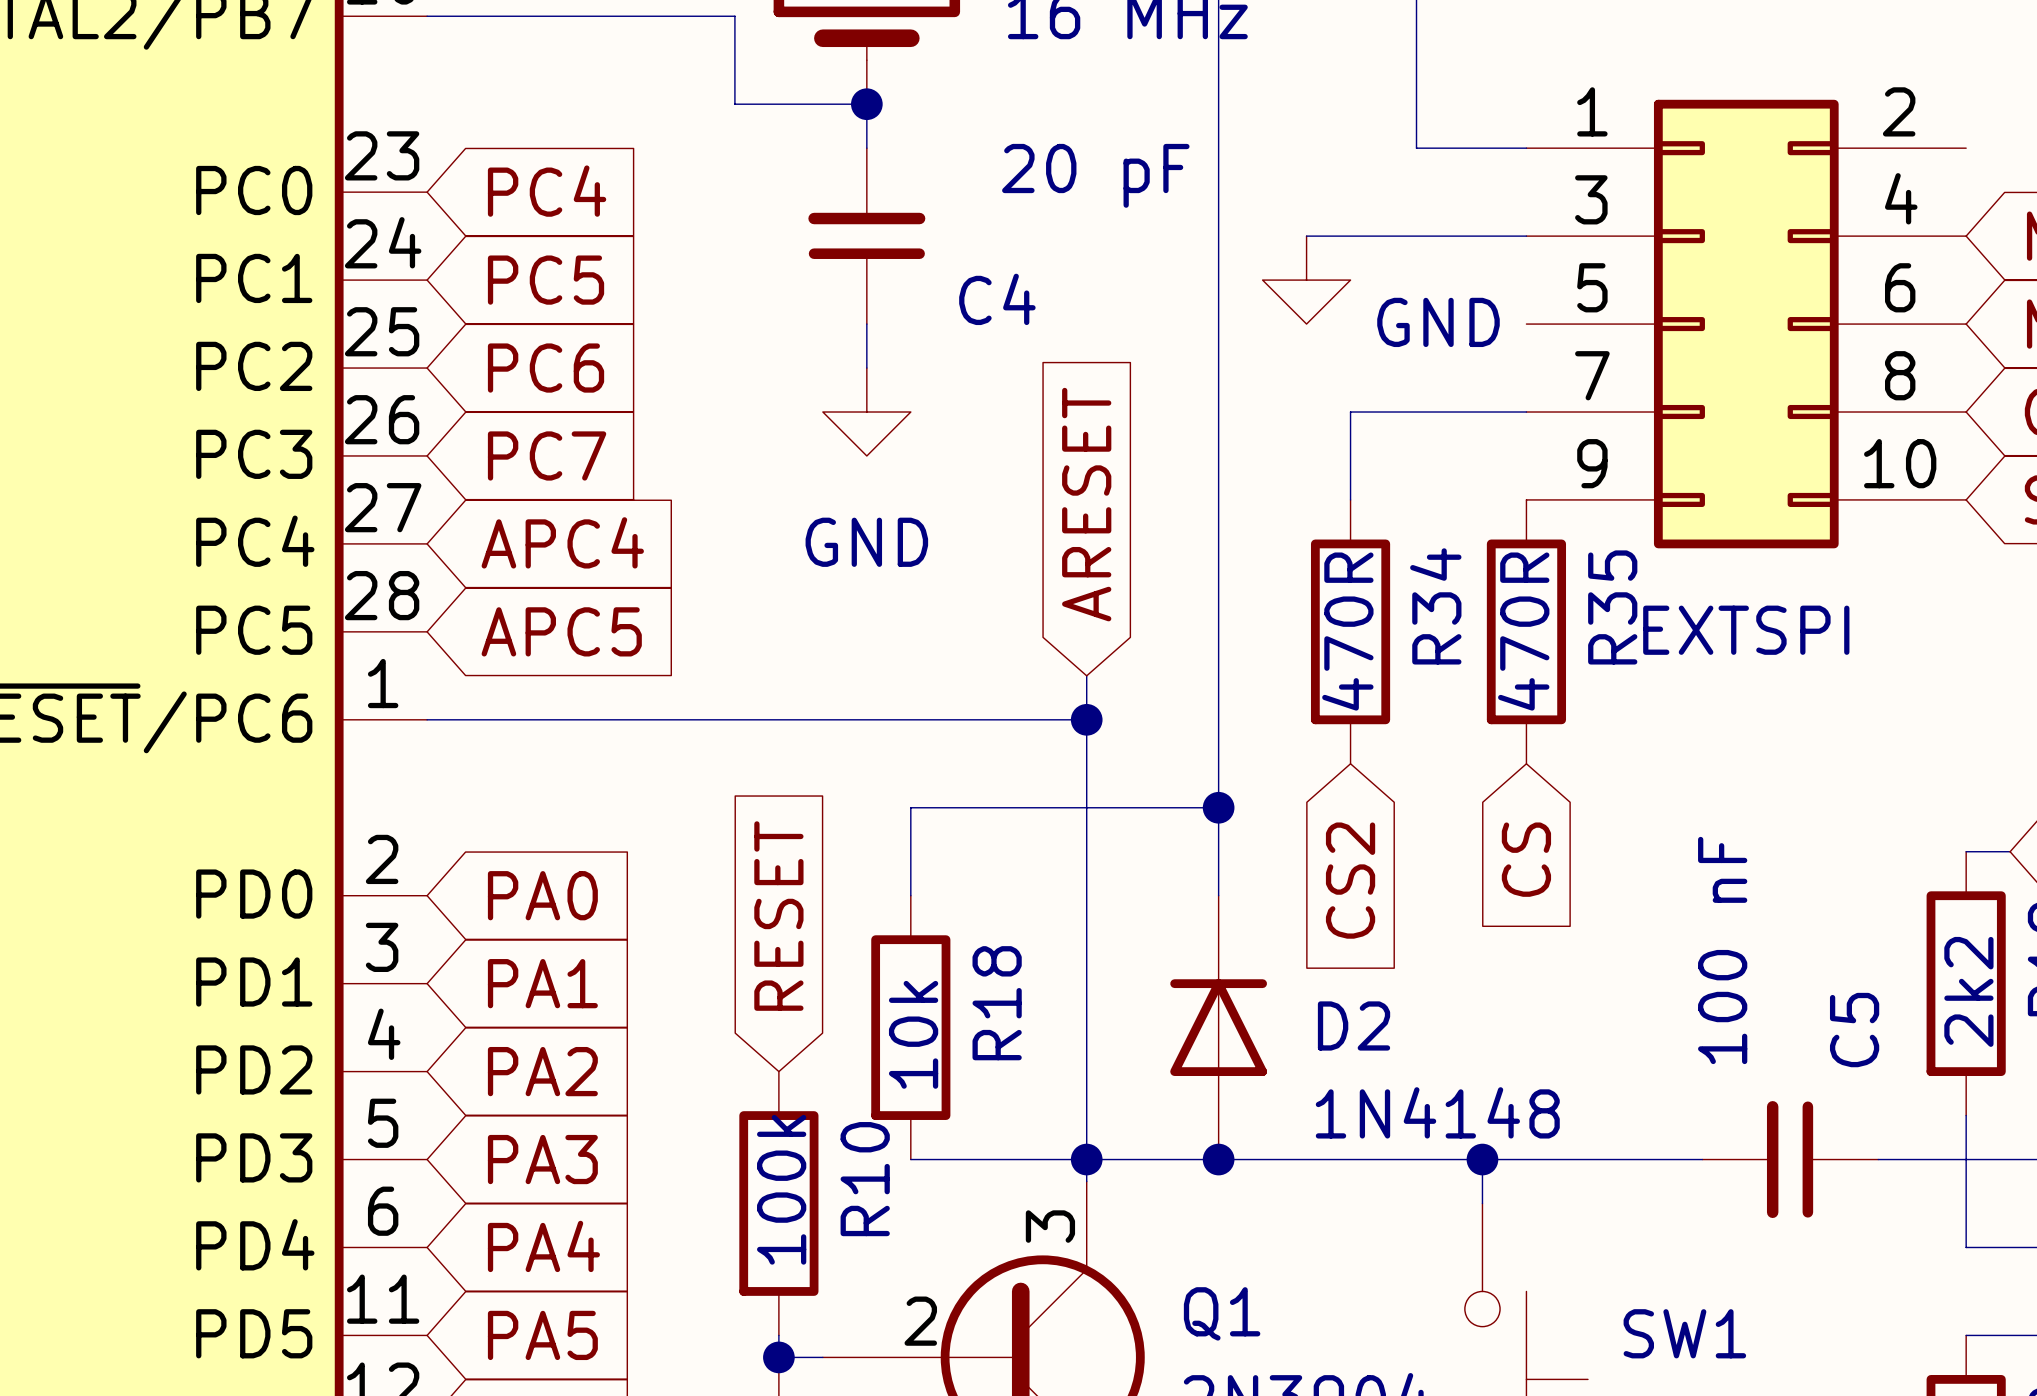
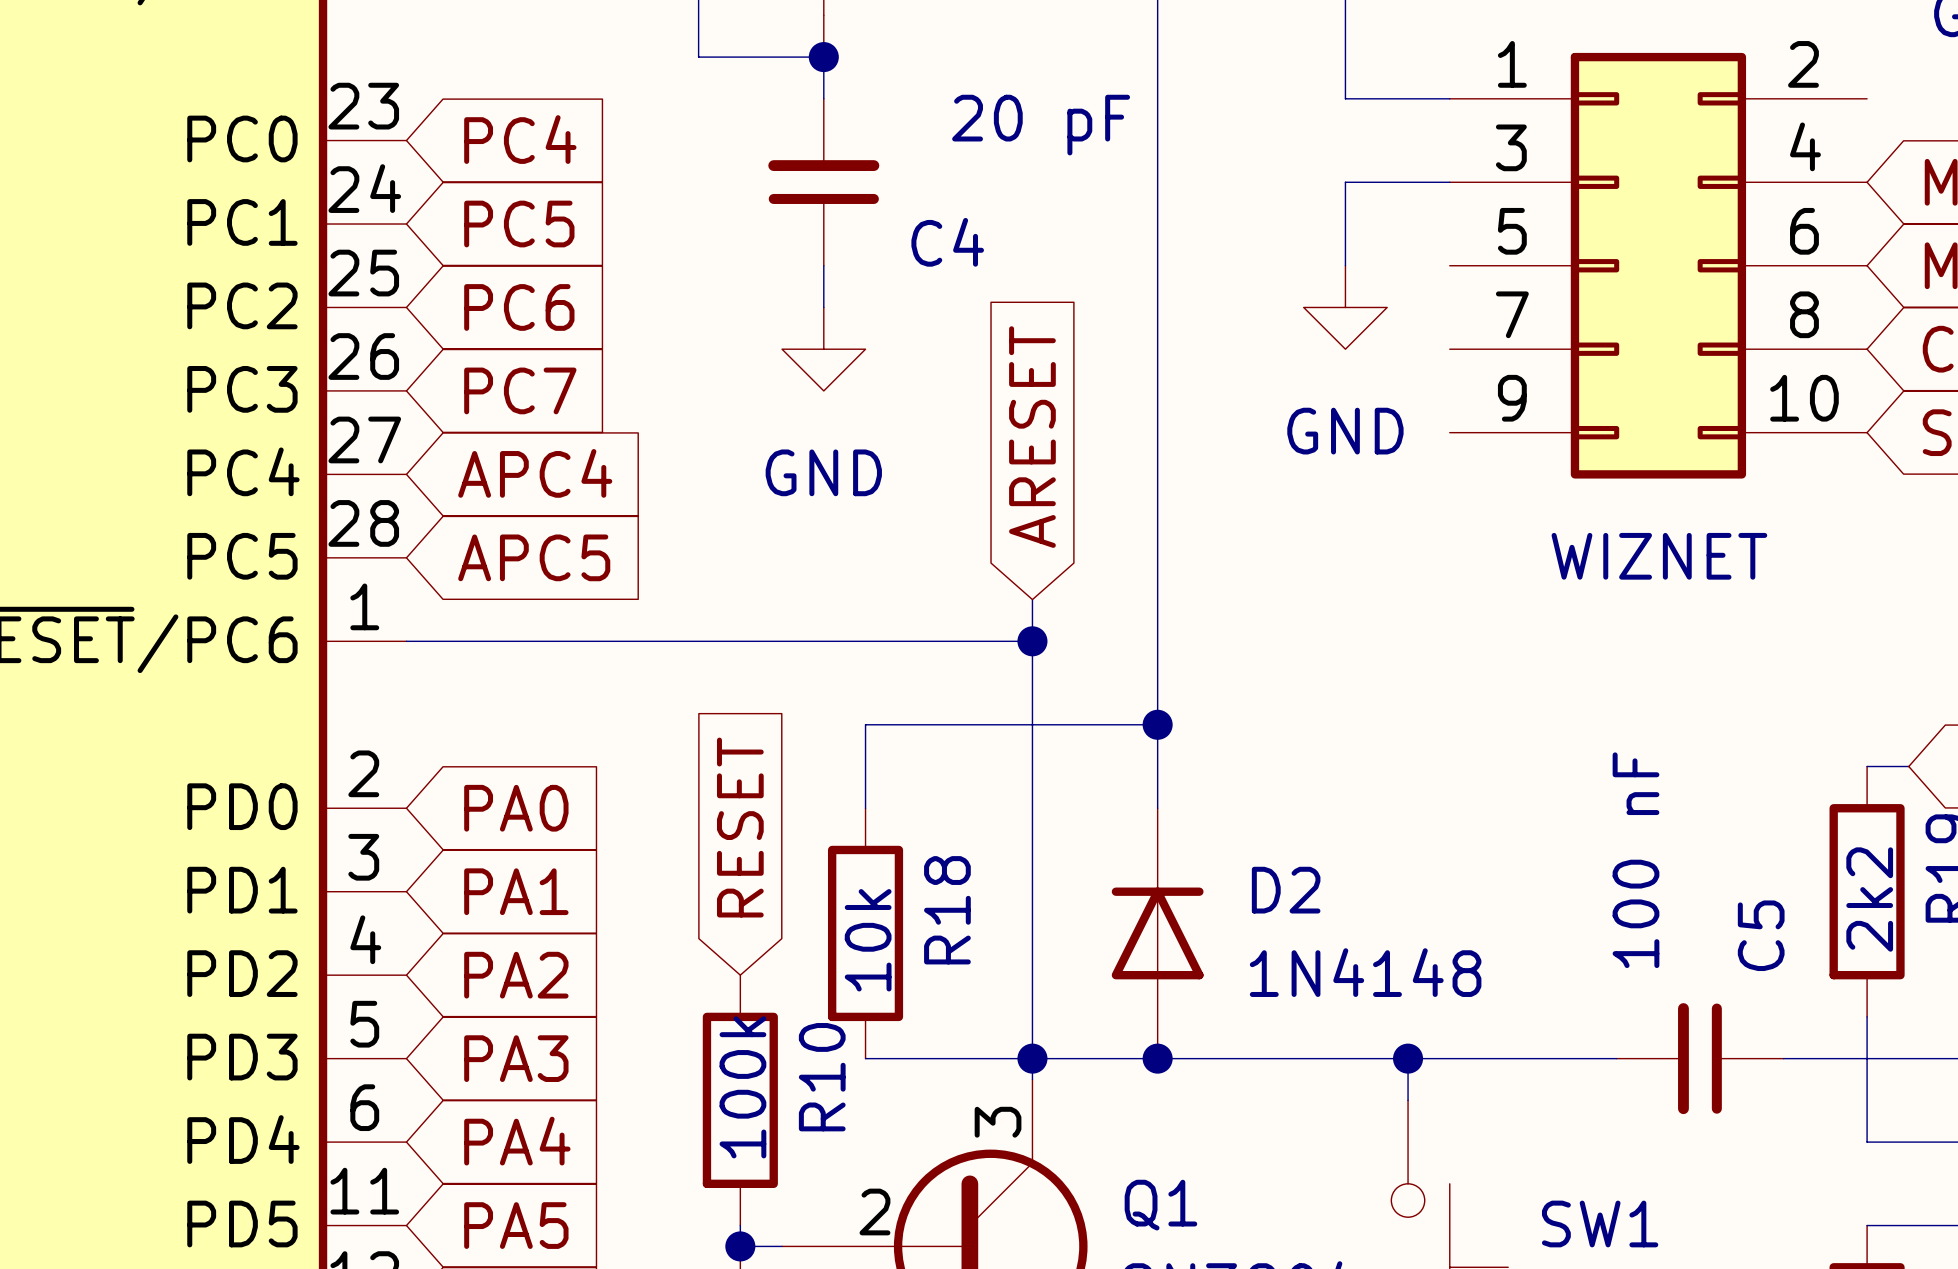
wire: (1306, 236) (1416, 236) -> (1345, 265) (1345, 182)
power symbol position: GND (1306, 280) -> GND (1345, 307)
power symbol text position: GND (1438, 322) -> GND (1345, 431)
wire: (1526, 412) (1350, 412) (1350, 499) -> none
part value: EXTSPI (1746, 630) -> WIZNET (1659, 556)
R34: 470R (1350, 631) -> none
R35: 470R (1526, 631) -> none
global label: CS (1526, 859) -> none
global label: CS2 (1350, 880) -> none
D2 name position: D2 (1354, 1025) -> D2 (1286, 890)
D2 value position: 1N4148 (1437, 1112) -> 1N4148 (1365, 972)

